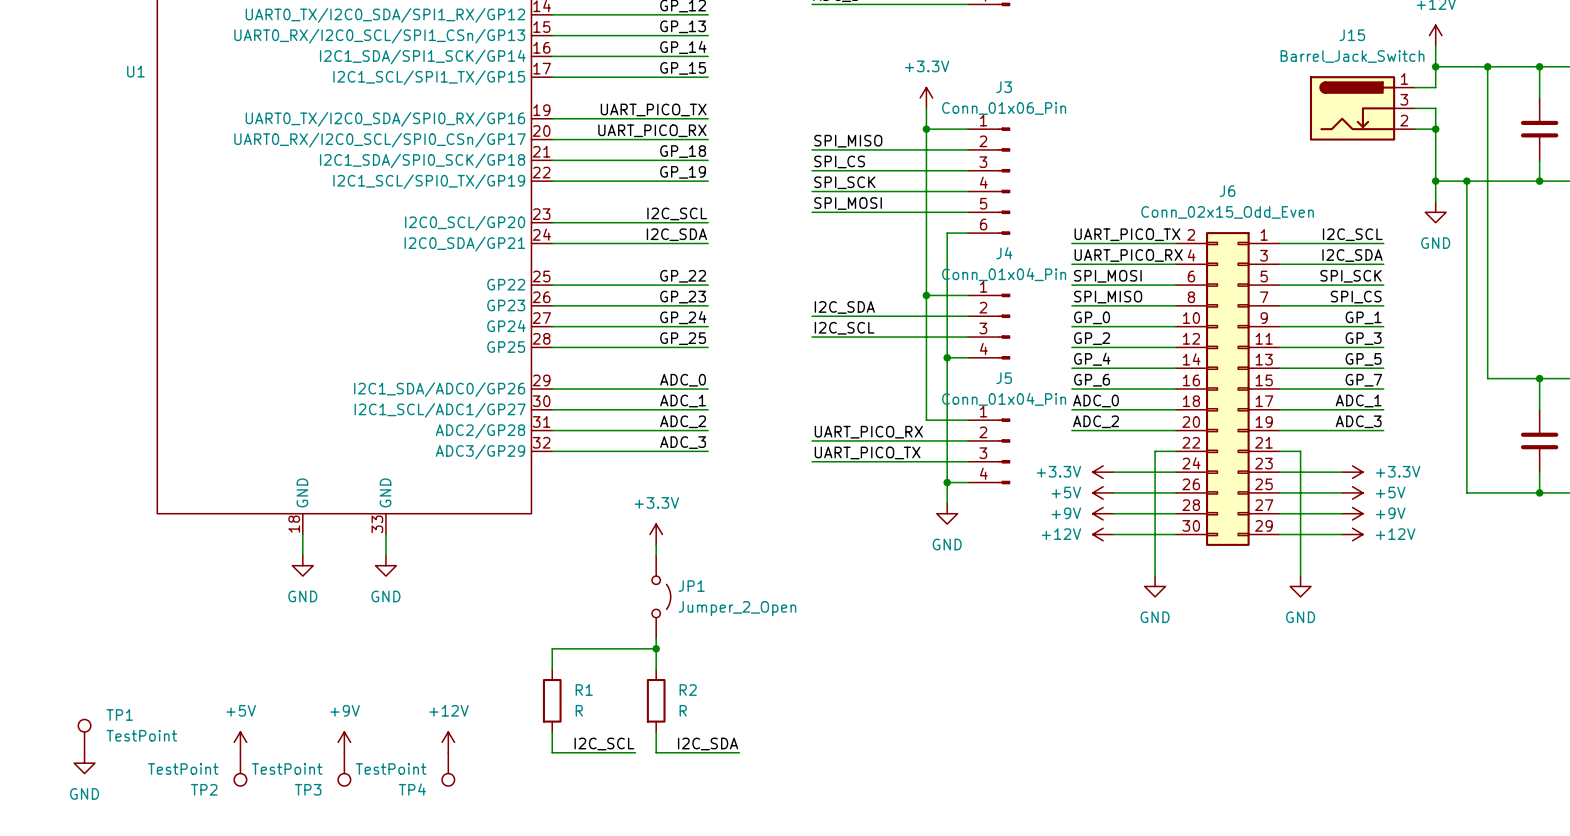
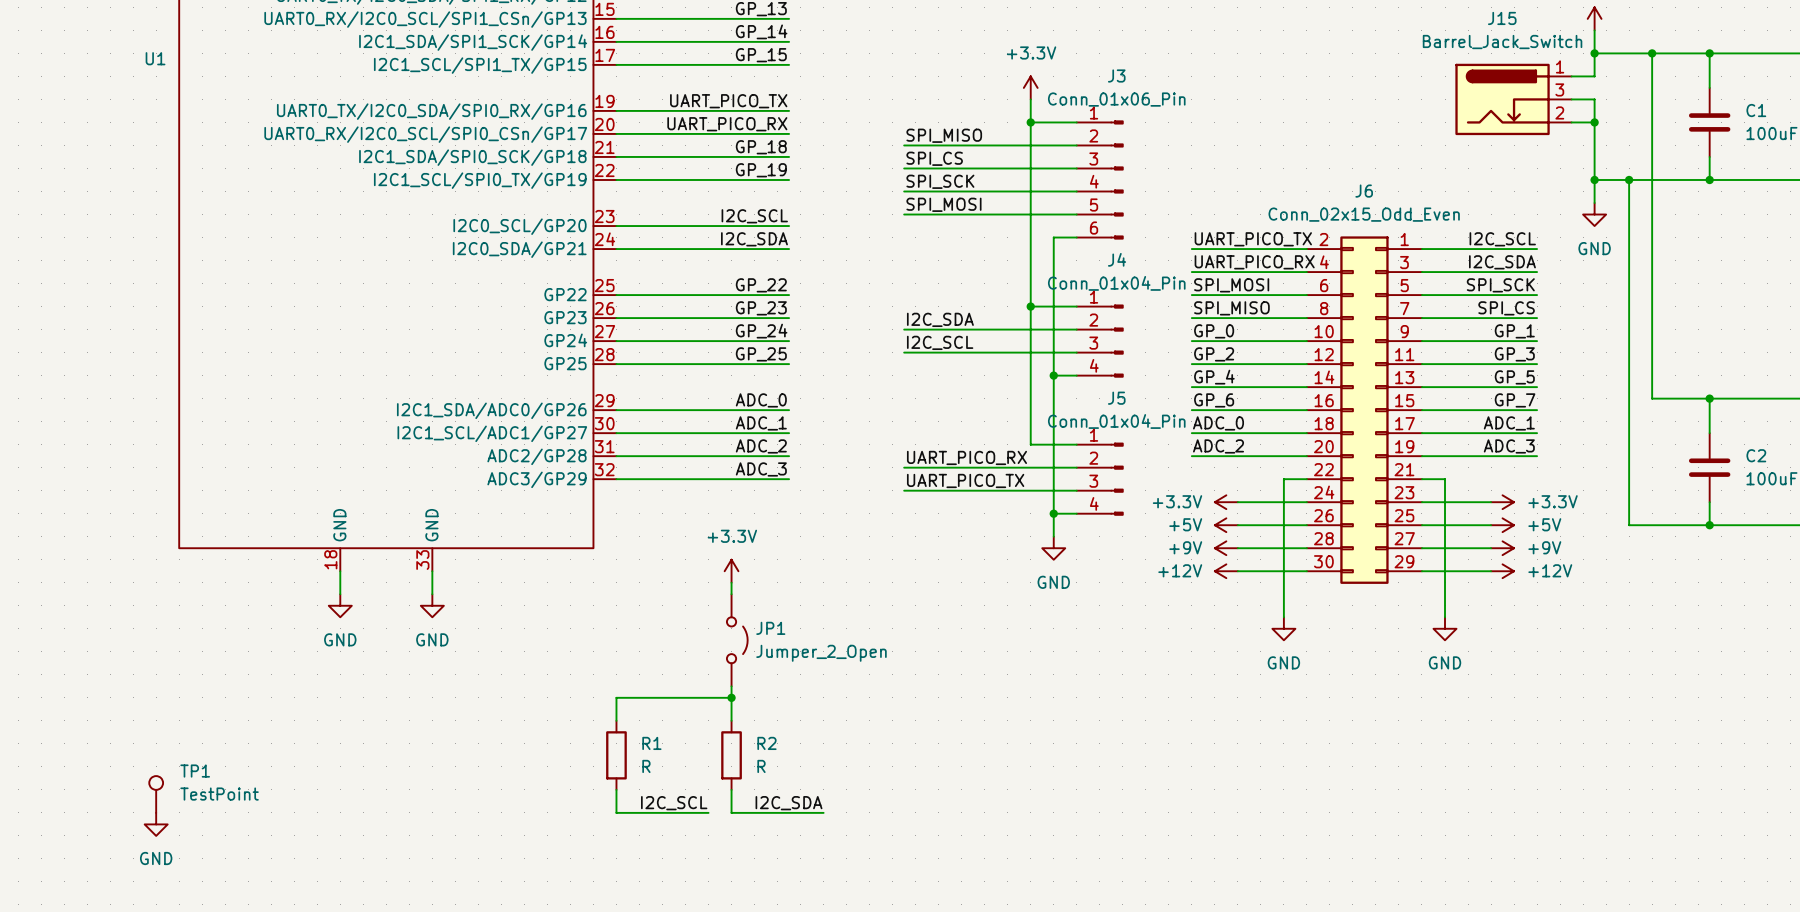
TP1 position: (84, 736) -> (156, 794)
power symbol: +5V (240, 742) -> none
power symbol: +9V (344, 742) -> none
power symbol: +12V (448, 742) -> none
power symbol position: GND (84, 763) -> GND (156, 824)
TP2: TestPoint (240, 769) -> none
TP3: TestPoint (344, 769) -> none
TP4: TestPoint (448, 769) -> none

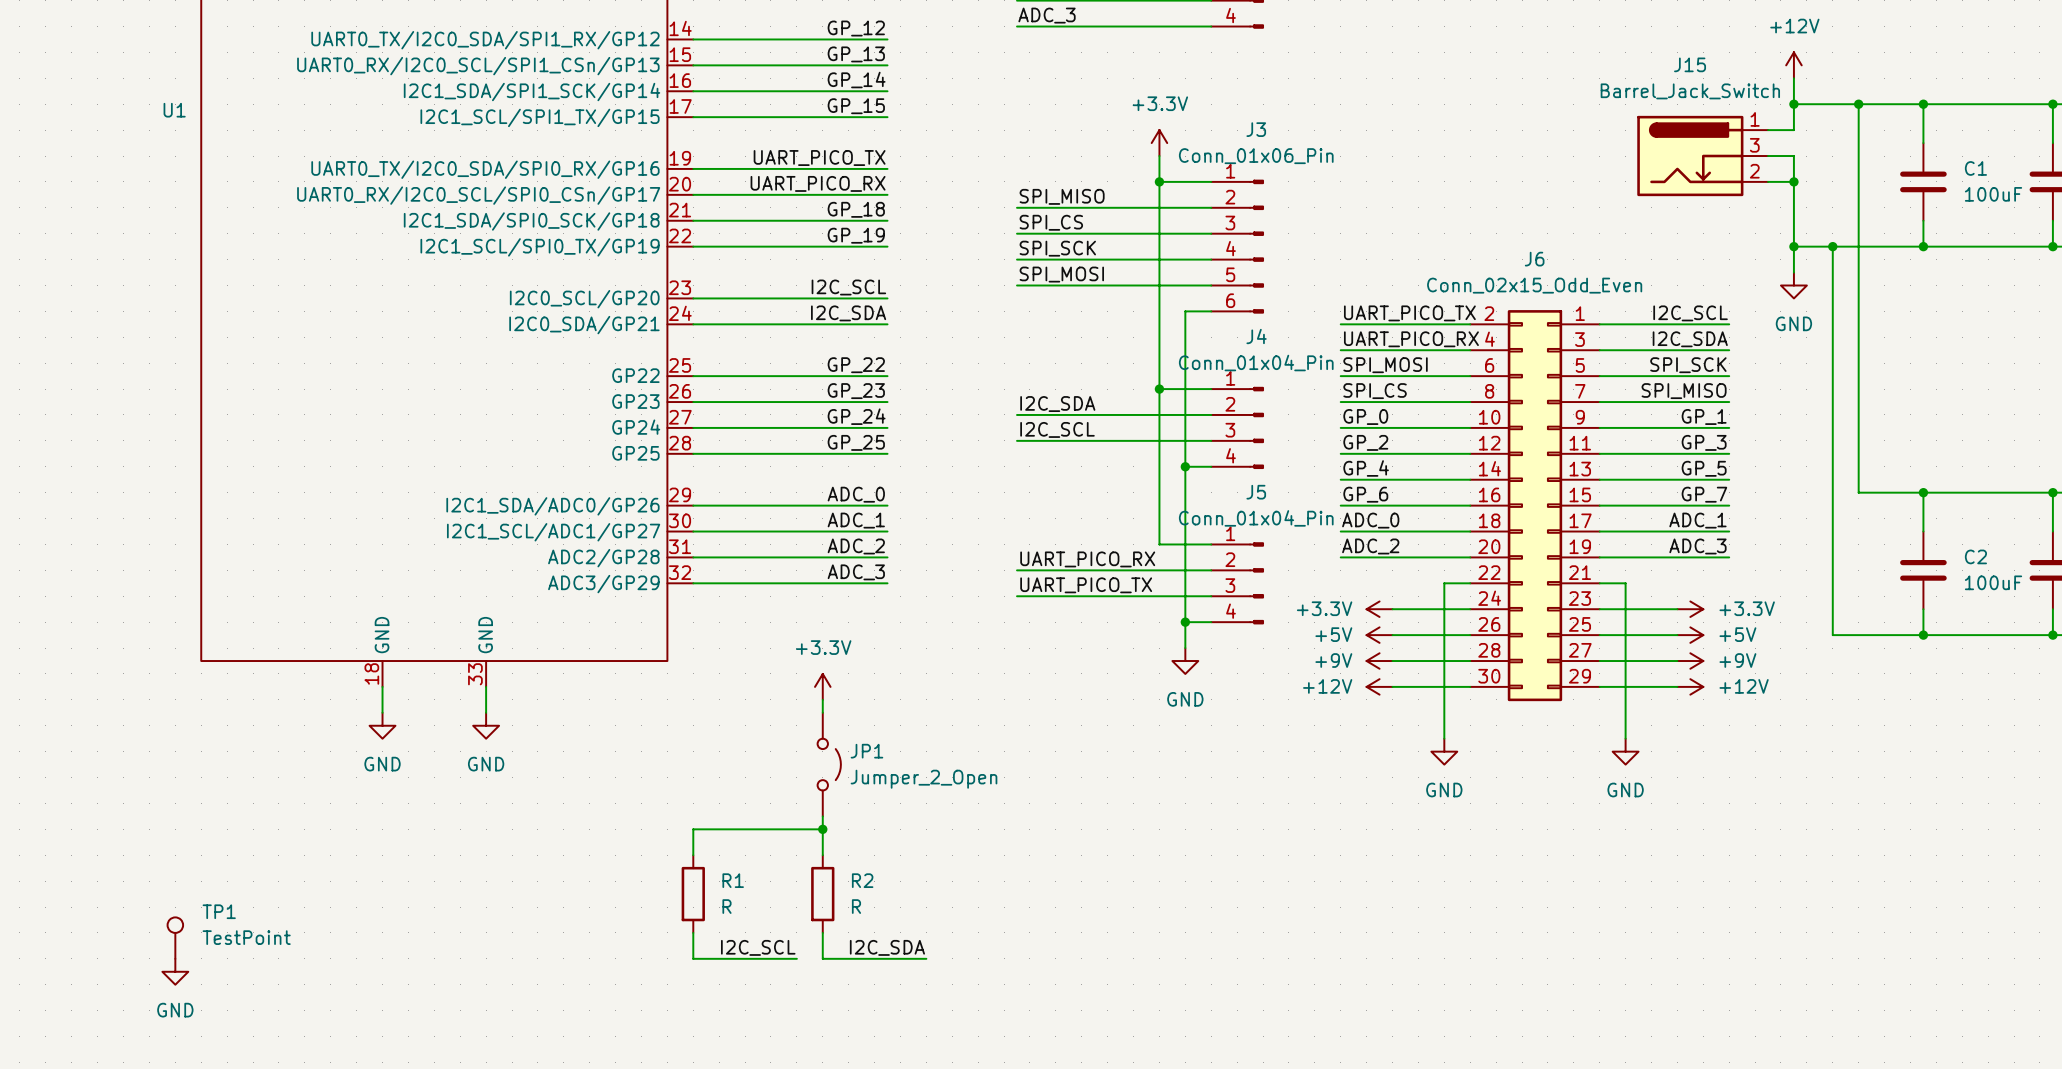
label: SPI_MISO (1231, 308) -> SPI_CS (1375, 391)
label: SPI_CS (1506, 308) -> SPI_MISO (1684, 391)

